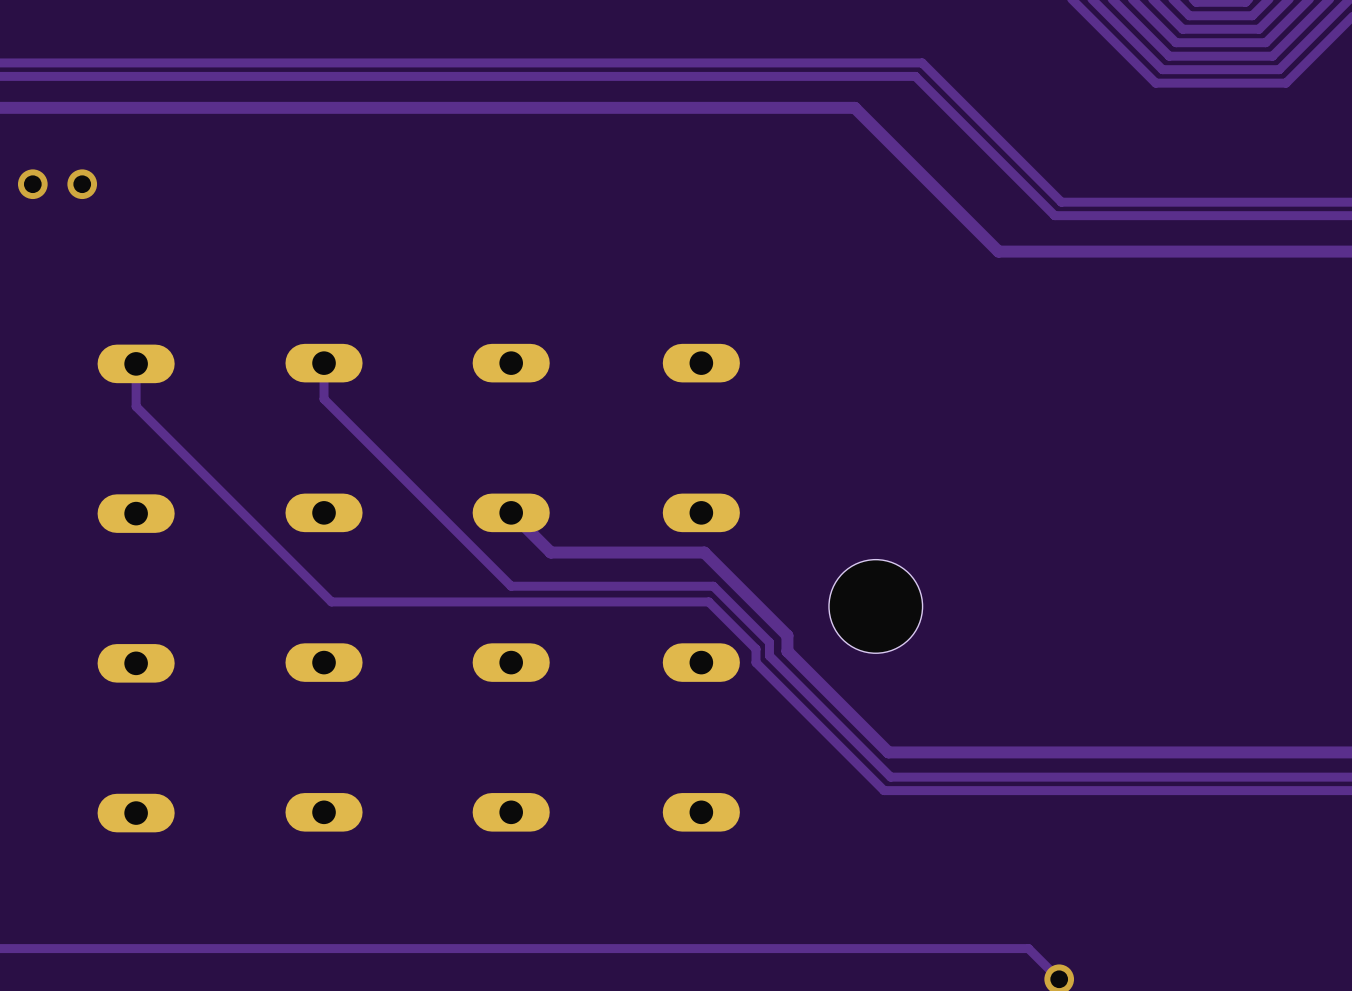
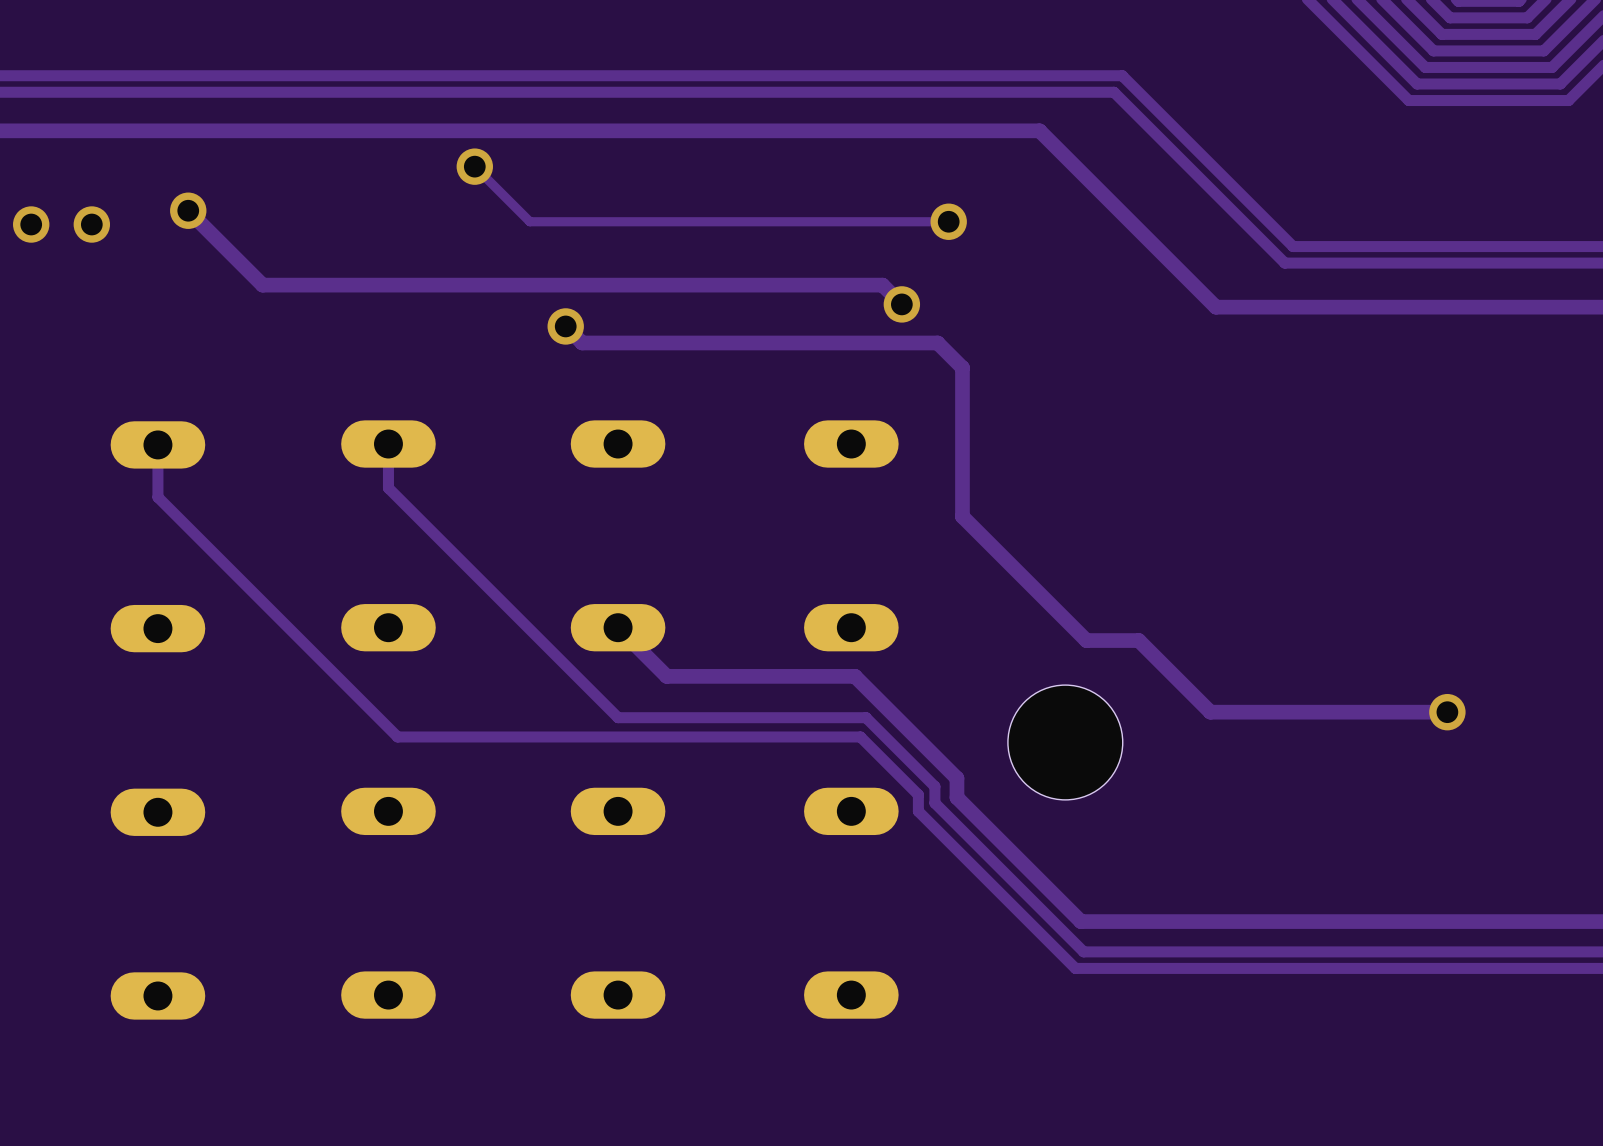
track: none -> (474, 166) (529, 221) (948, 221)
via: none -> (474, 166)
track: none -> (188, 210) (262, 285) (882, 285) (901, 304)
via: none -> (188, 210)
via: none -> (948, 221)
via: none -> (901, 304)
track: none -> (565, 326) (582, 342) (937, 342) (962, 367) (962, 516) (1086, 640) (1138, 640) (1210, 712) (1447, 712)
via: none -> (565, 326)
via: none -> (1447, 712)

